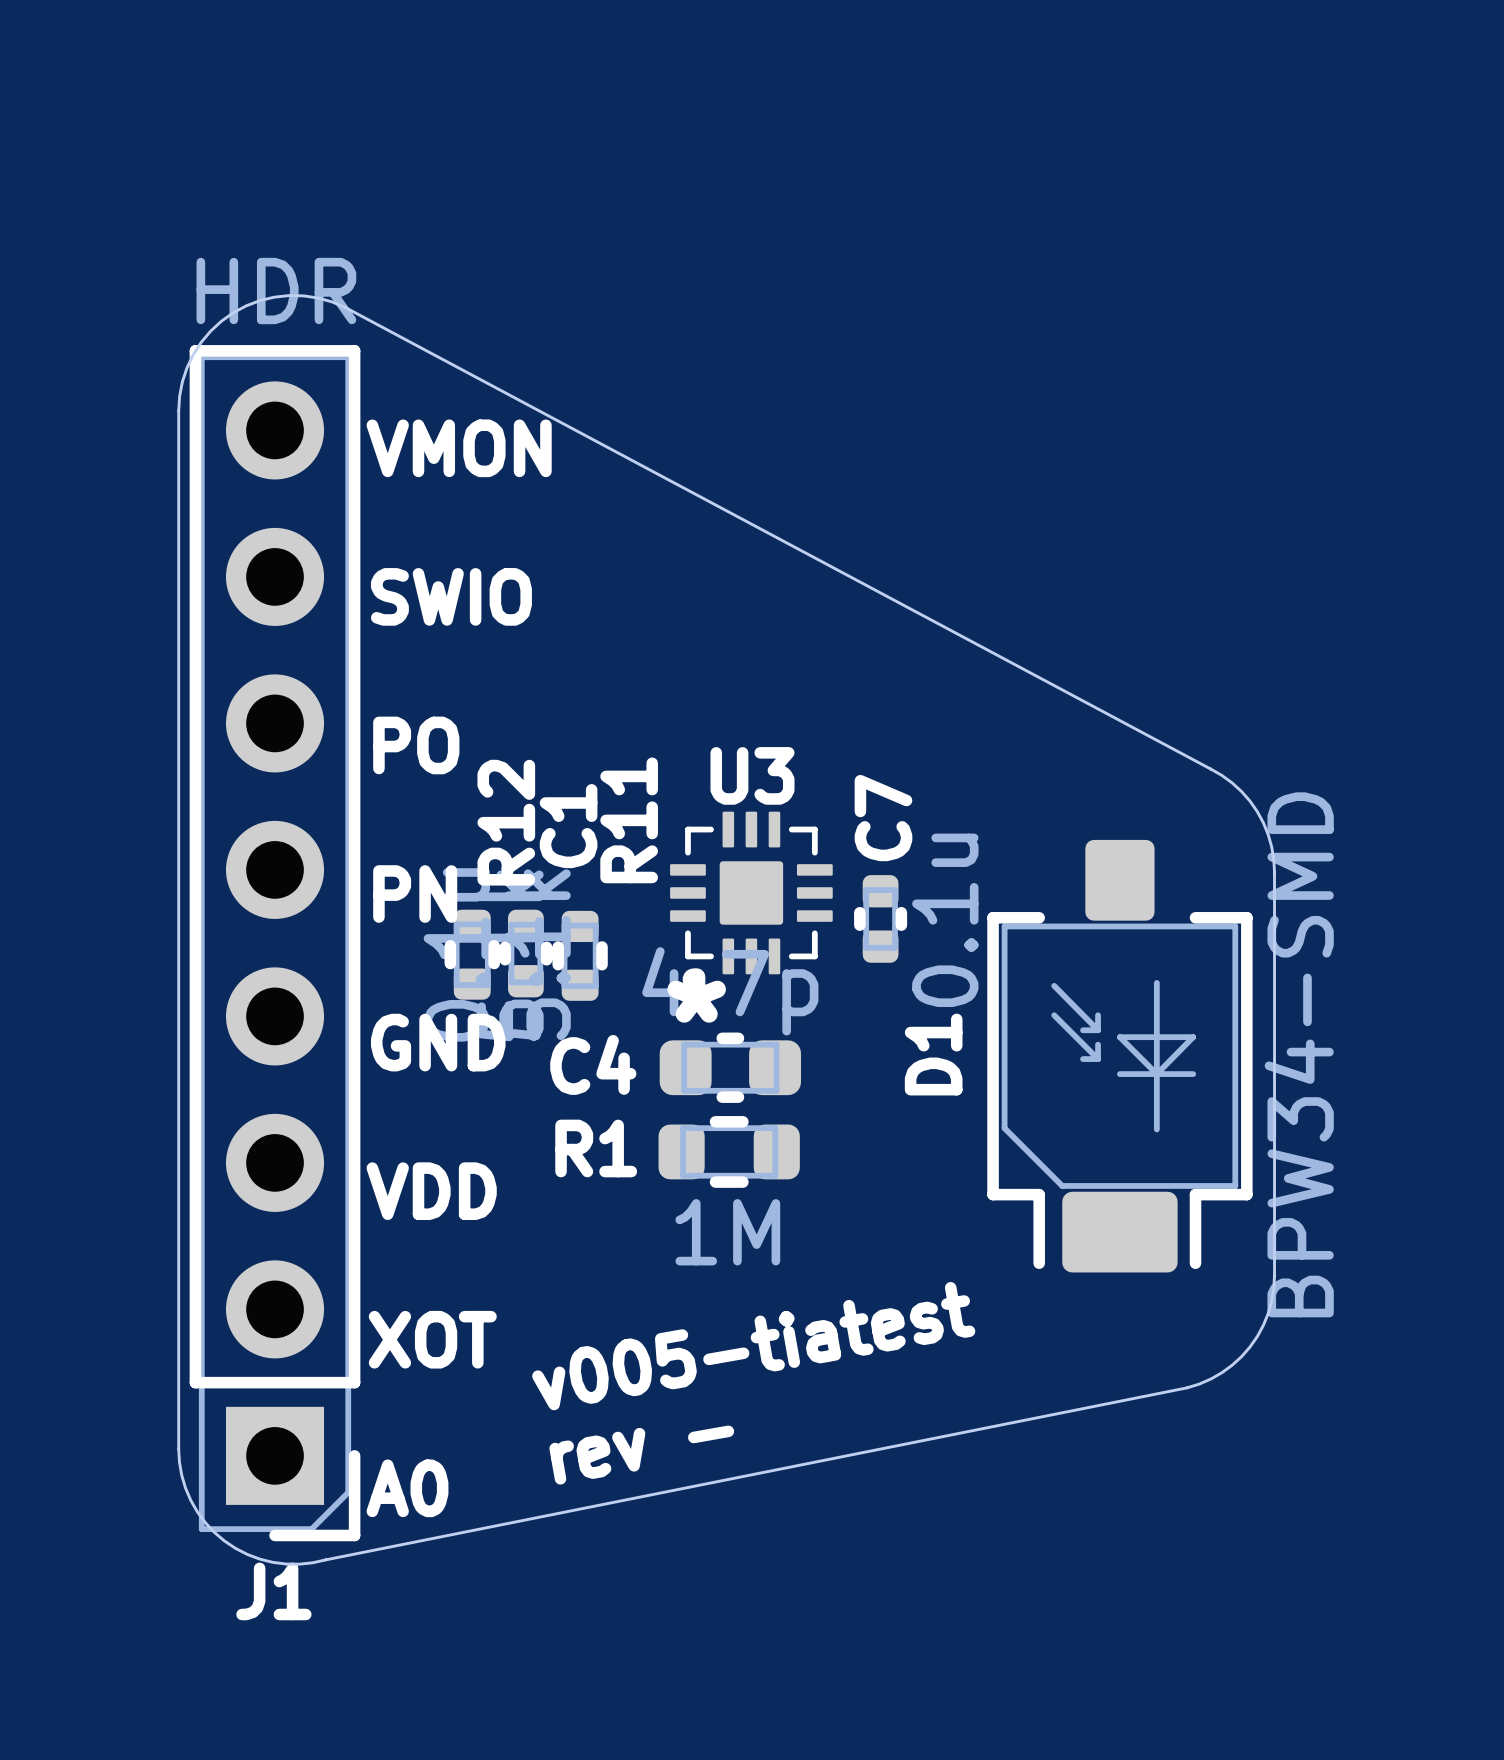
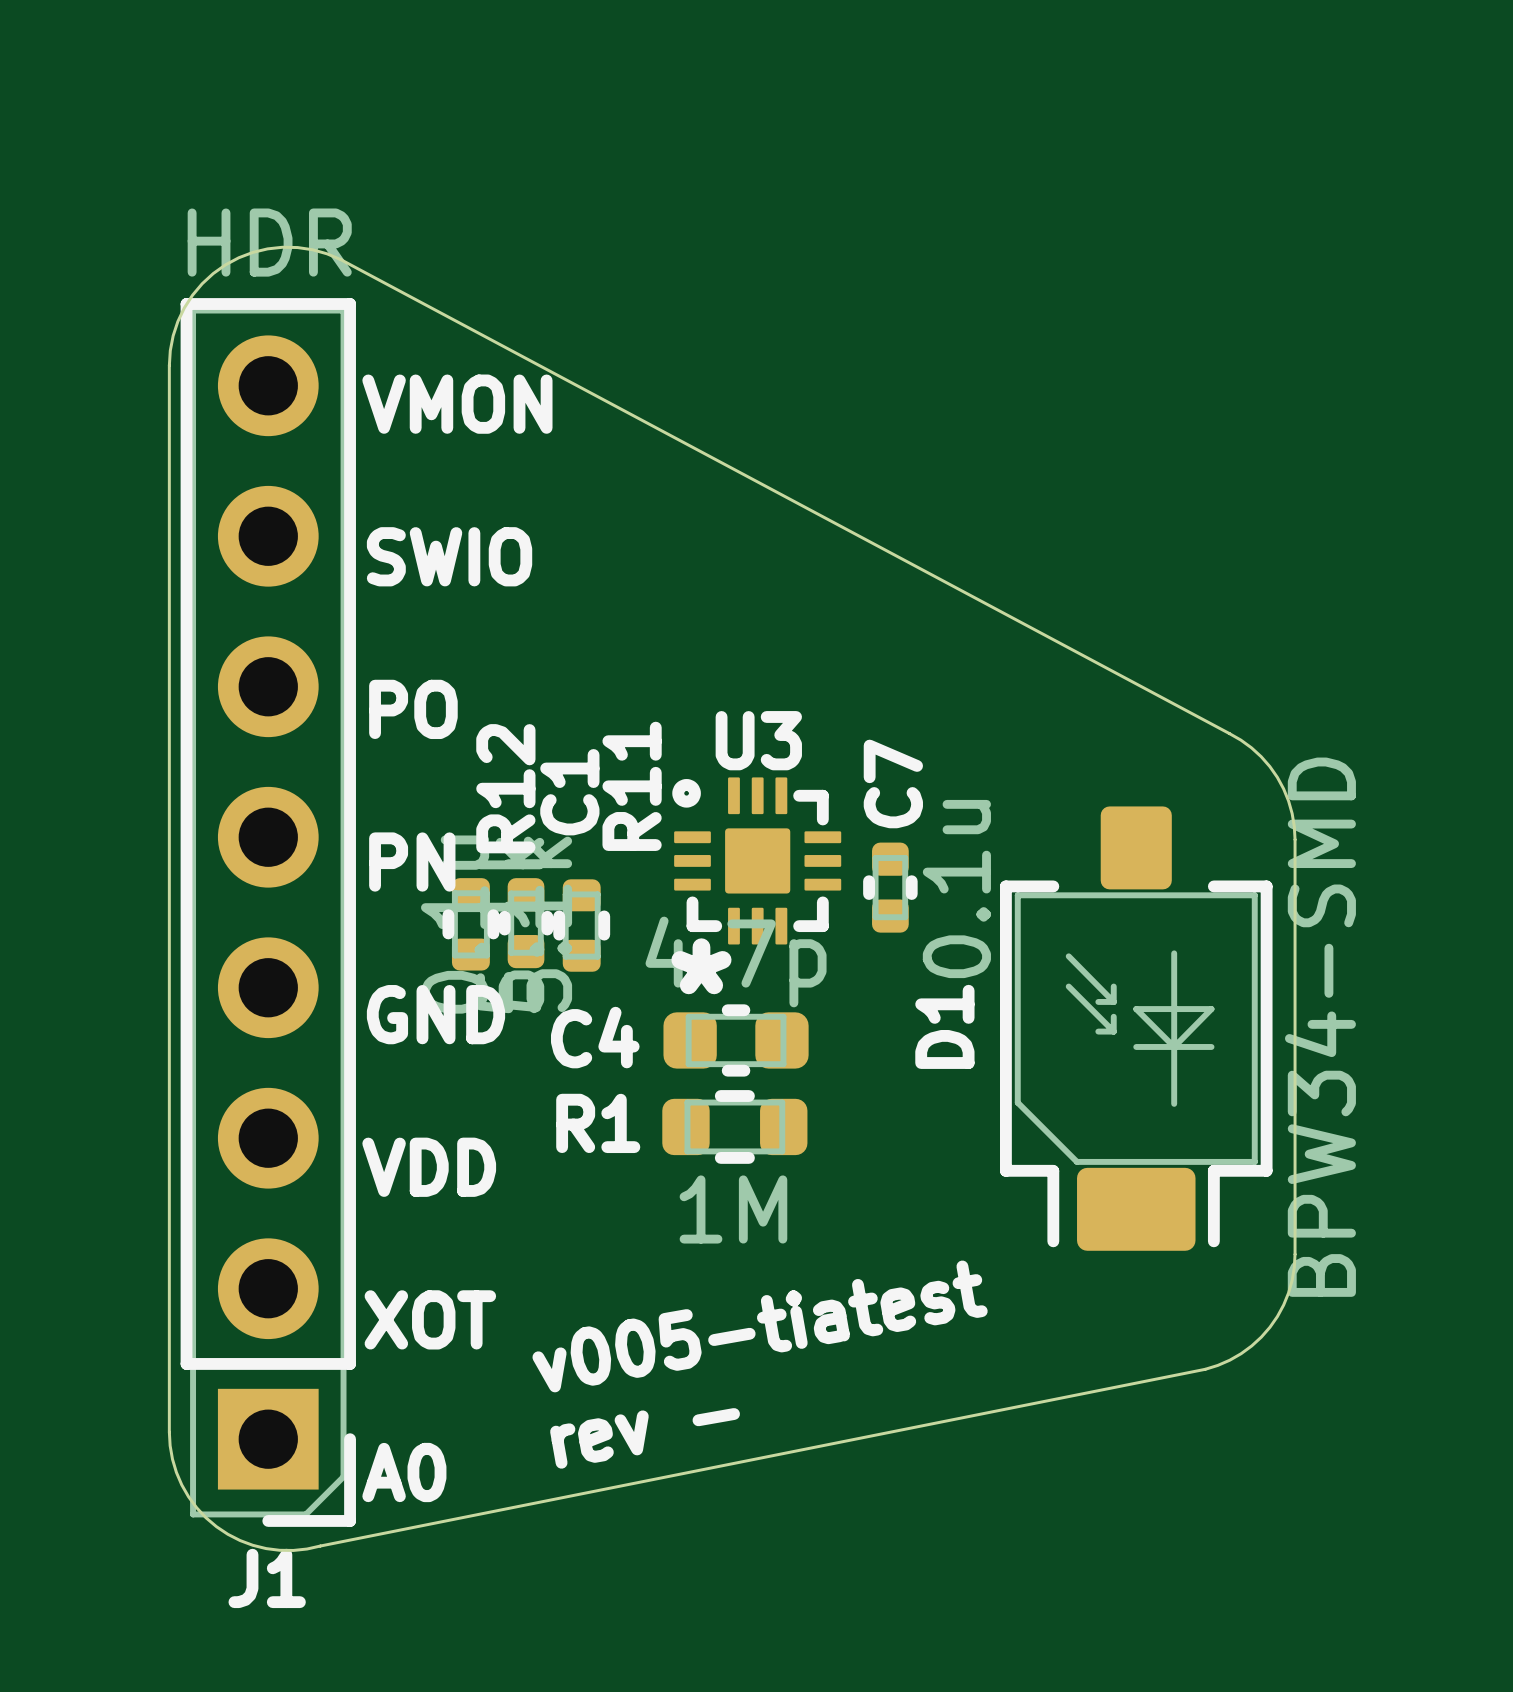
U3 footprint: [670, 811, 833, 991] -> [672, 777, 842, 945]

